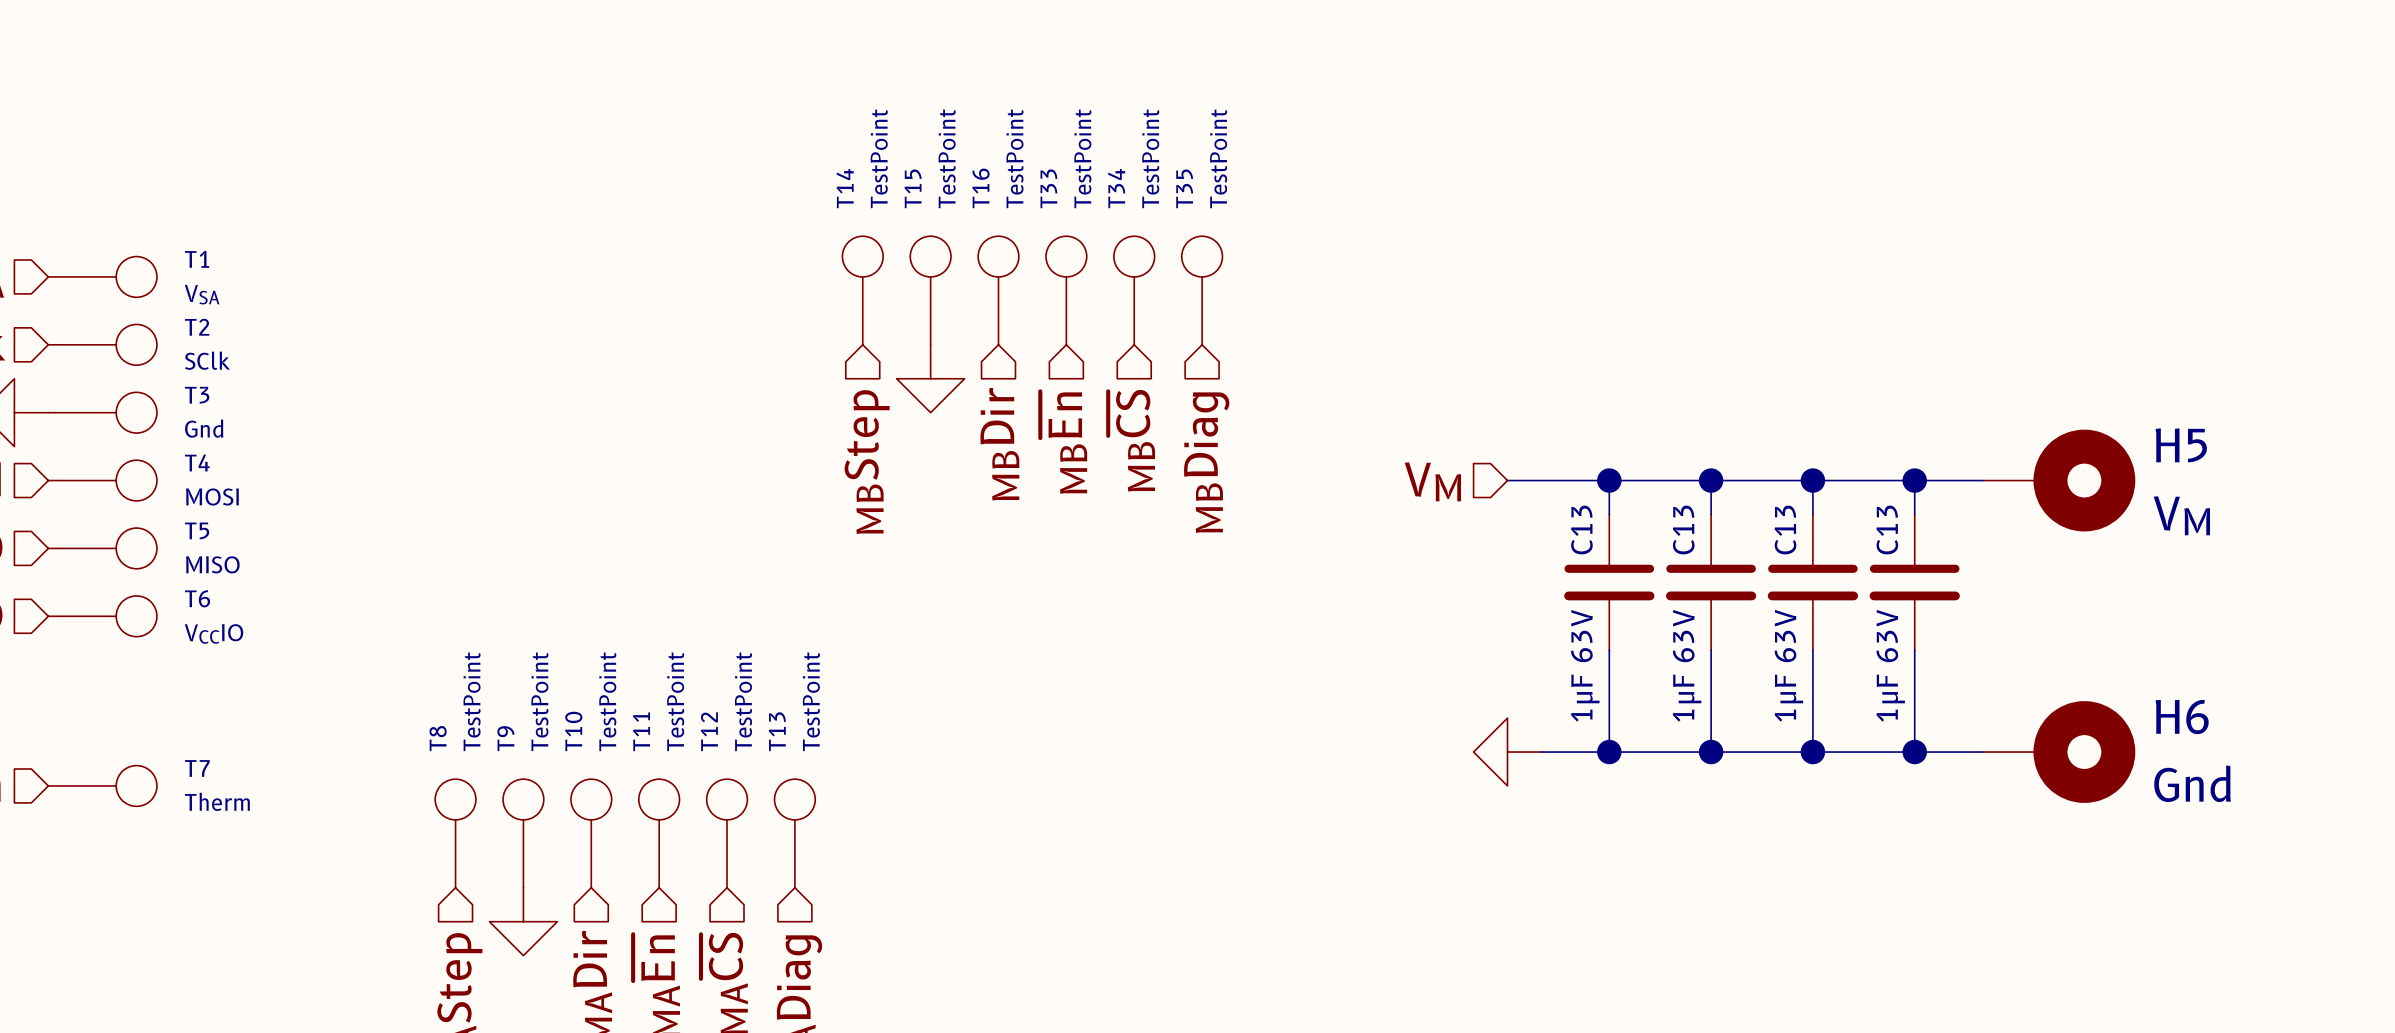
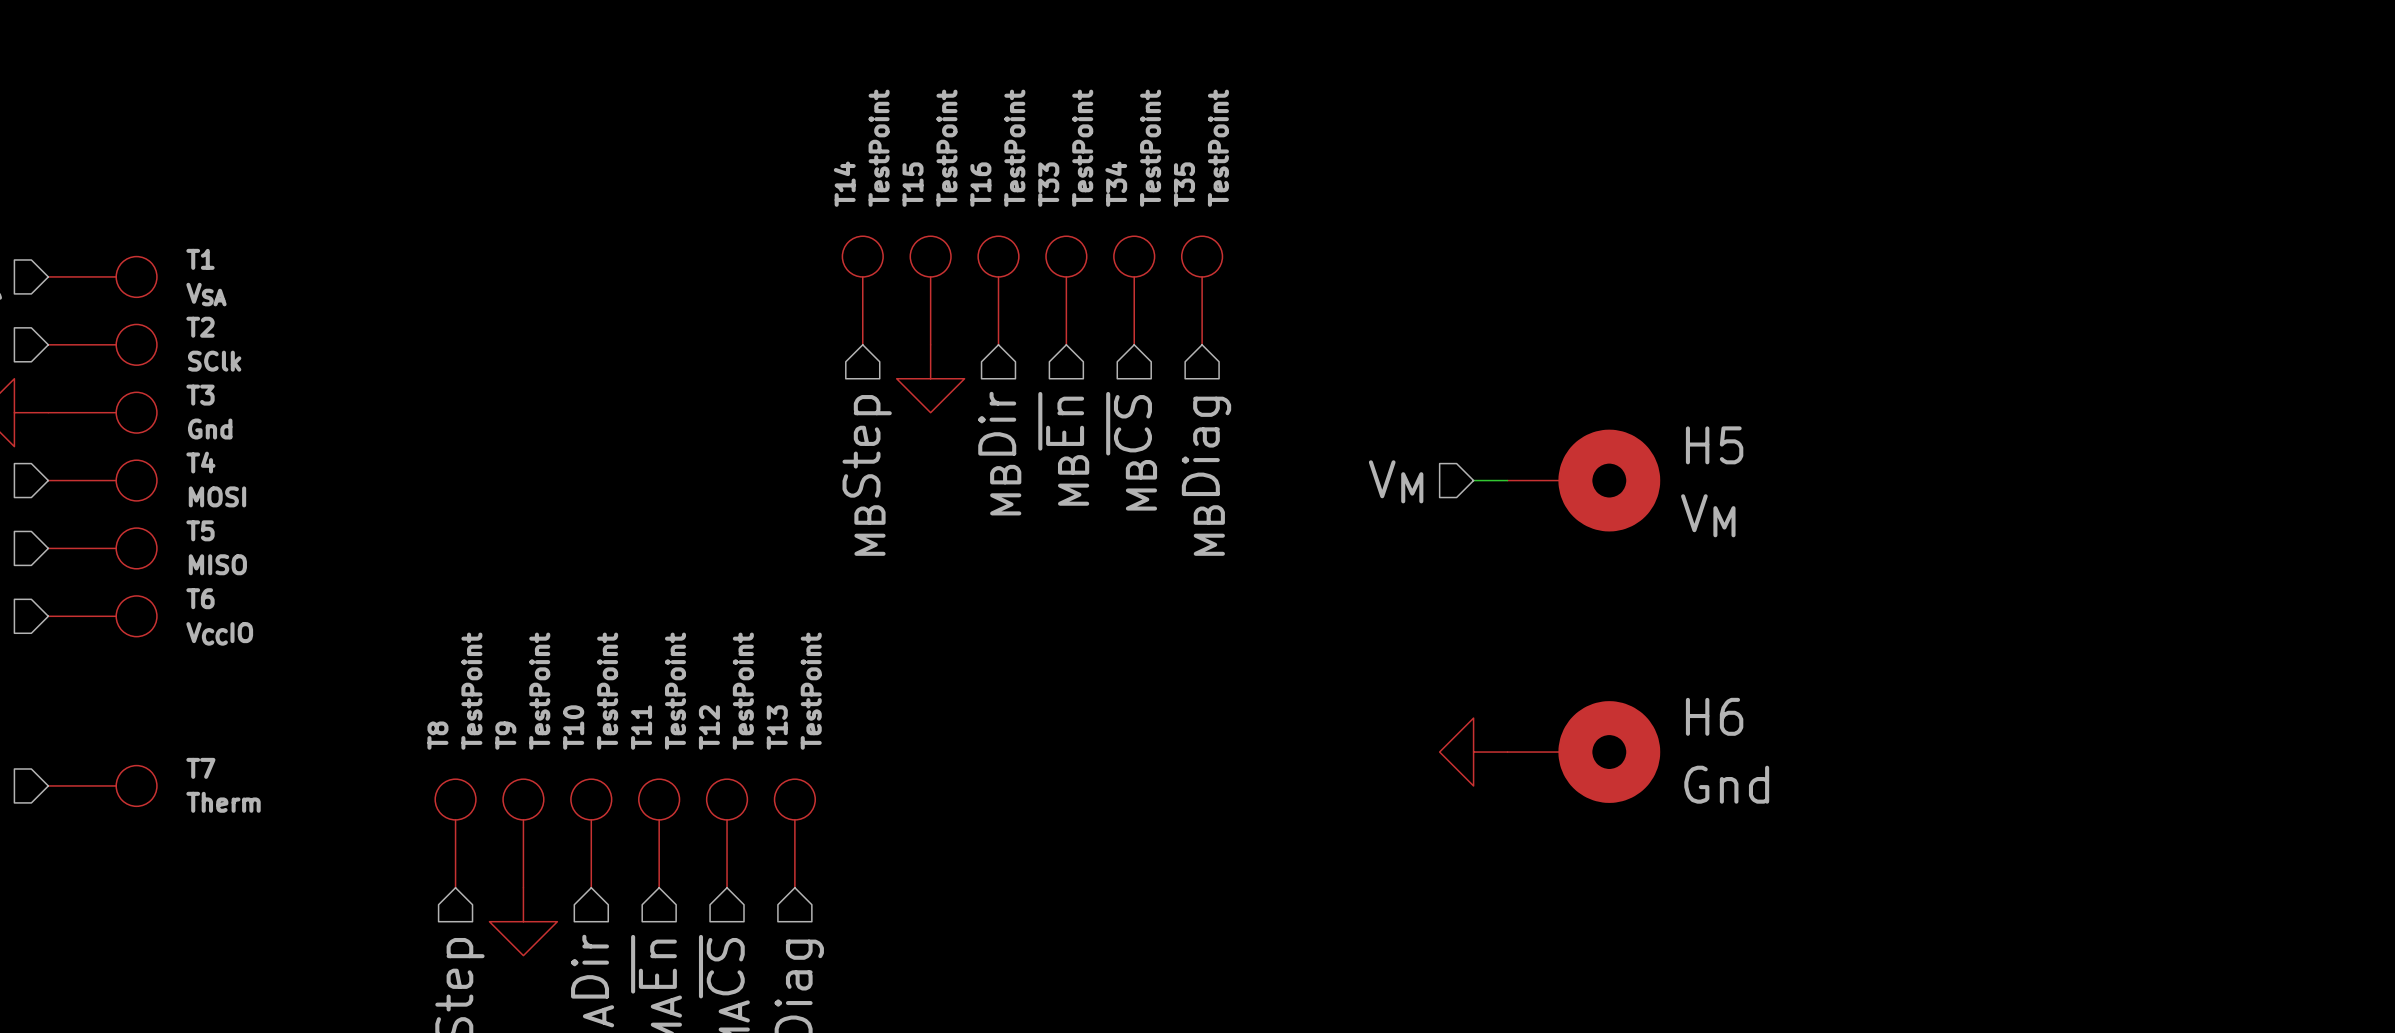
wire: (1507, 480) (1982, 480) -> (1507, 480) (1473, 480)
wire: (1609, 480) (1609, 514) -> none
junction: (1609, 480) -> none
wire: (1711, 480) (1711, 514) -> none
junction: (1711, 480) -> none
wire: (1812, 480) (1812, 514) -> none
junction: (1812, 480) -> none
wire: (1914, 480) (1914, 514) -> none
junction: (1914, 480) -> none
H5 position: (2058, 480) -> (1583, 480)
hierarchical label position: VM (1432, 481) -> VM (1396, 481)
C13: 1μF 63V (1609, 582) -> none
C13: 1μF 63V (1711, 582) -> none
C13: 1μF 63V (1812, 582) -> none
C13: 1μF 63V (1914, 582) -> none
wire: (1609, 650) (1609, 752) -> none
wire: (1711, 650) (1711, 752) -> none
wire: (1812, 650) (1812, 752) -> none
wire: (1914, 650) (1914, 752) -> none
power symbol position: (1507, 752) -> (1473, 752)
wire: (1541, 752) (1982, 752) -> none
junction: (1609, 752) -> none
junction: (1711, 752) -> none
junction: (1812, 752) -> none
junction: (1914, 752) -> none
H6 position: (2058, 752) -> (1583, 752)

